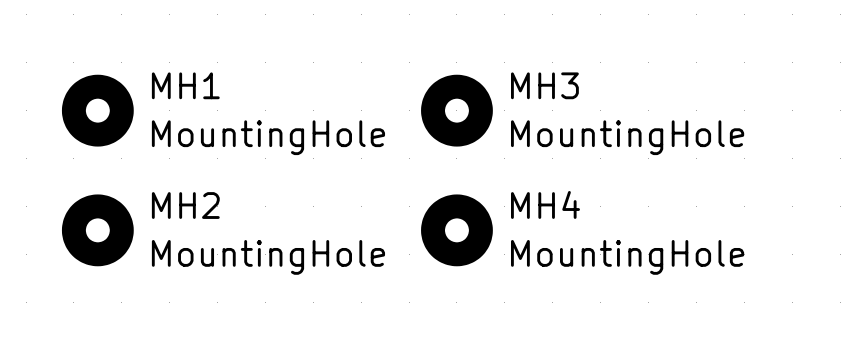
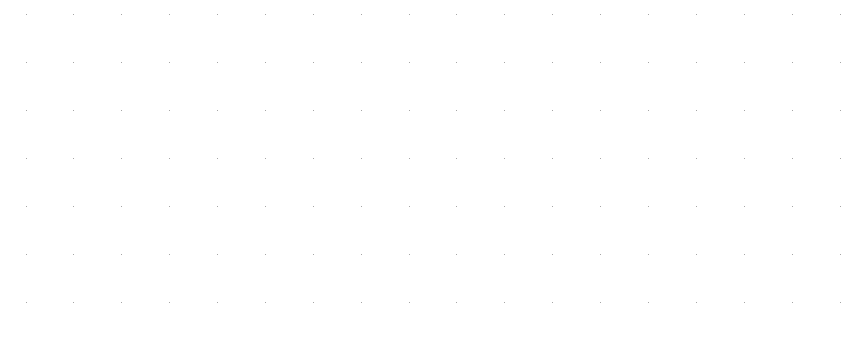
MH1: MountingHole (97, 110) -> none
MH3: MountingHole (456, 110) -> none
MH2: MountingHole (97, 230) -> none
MH4: MountingHole (456, 230) -> none

